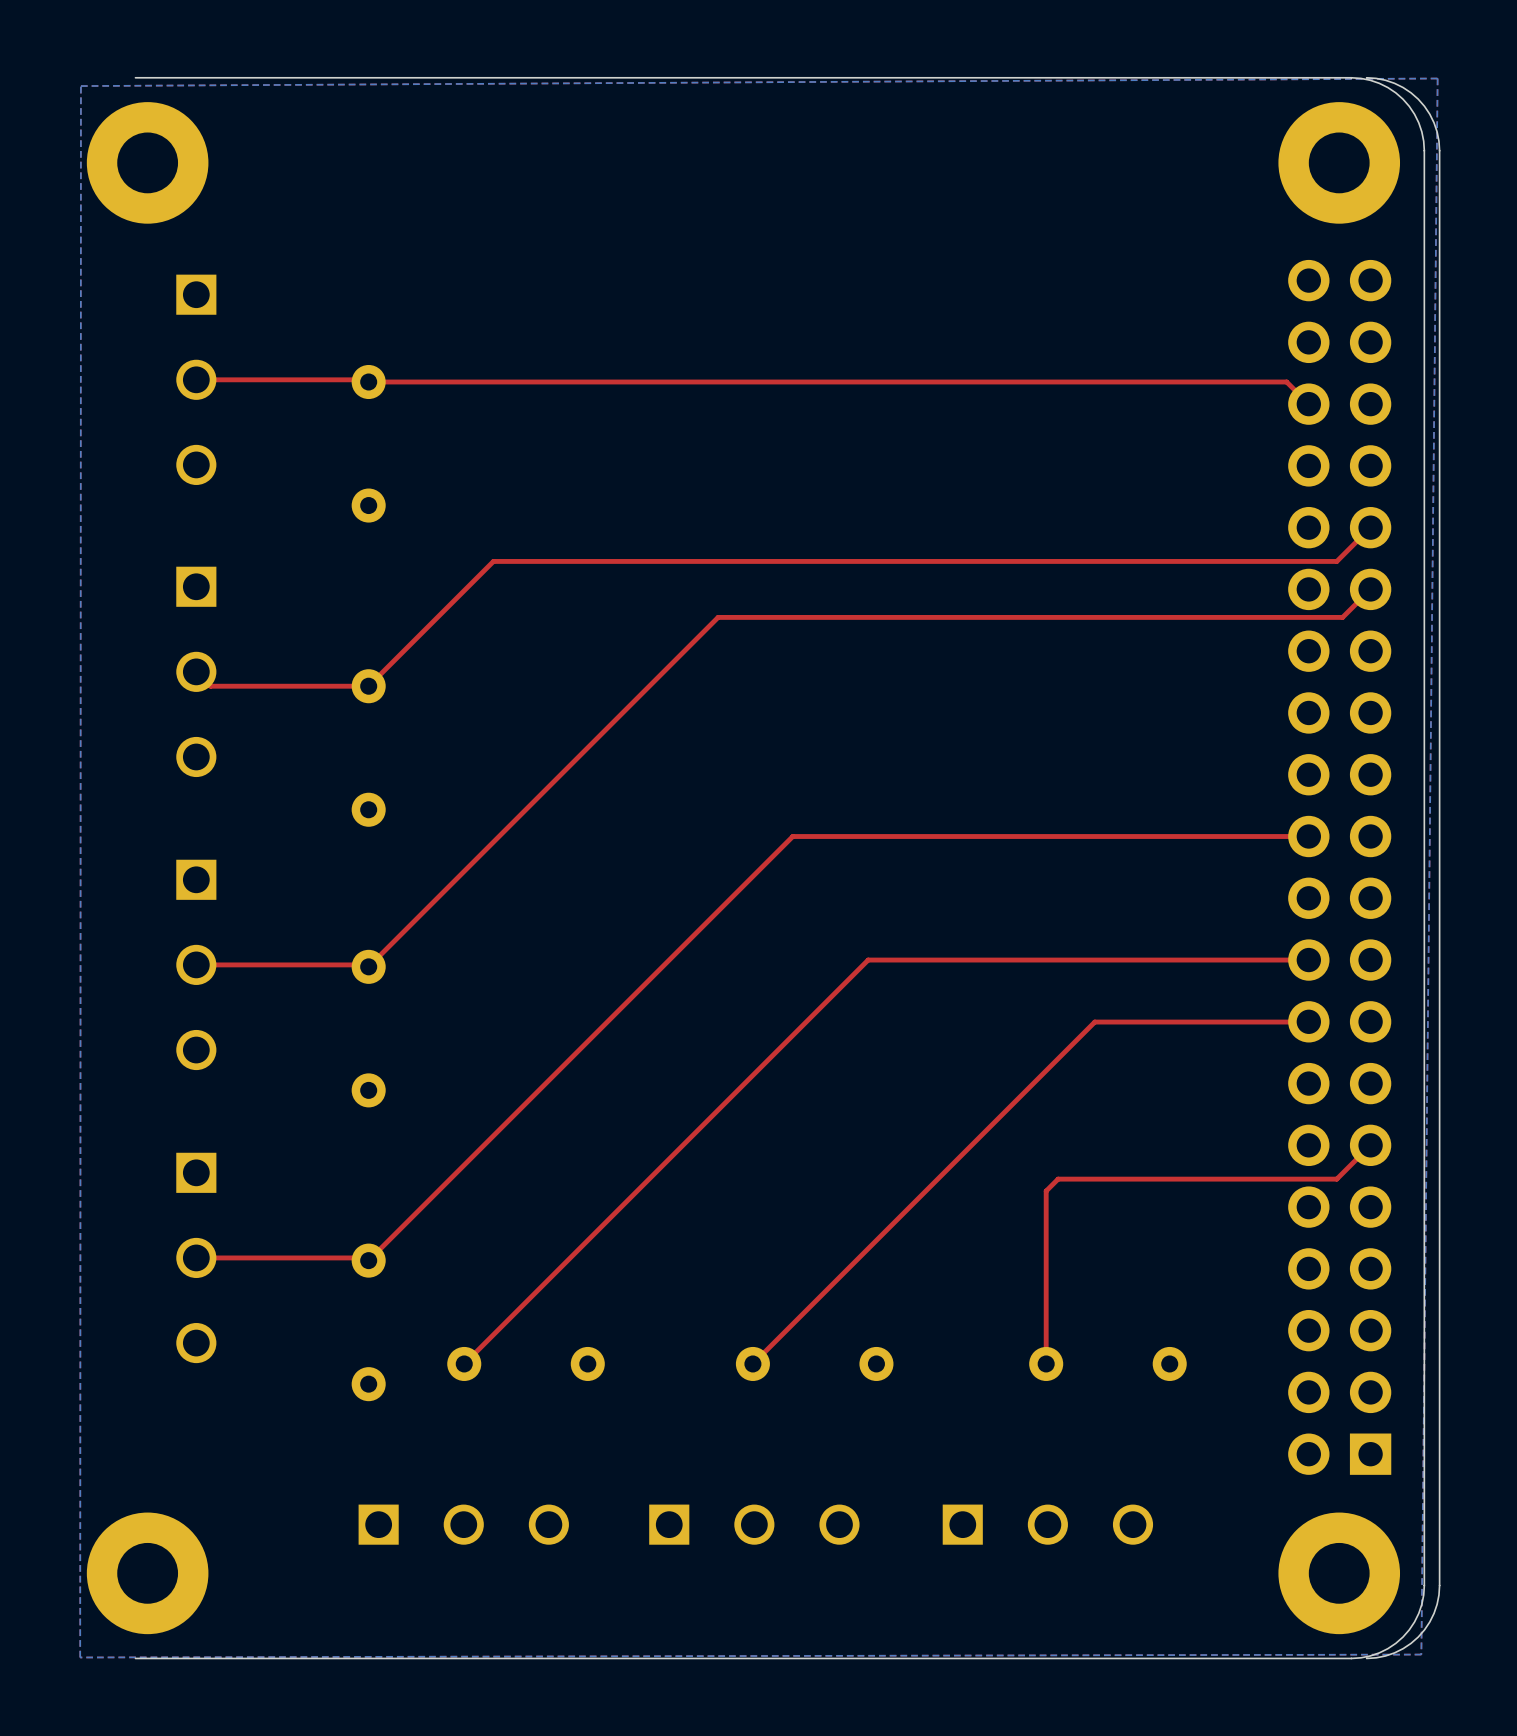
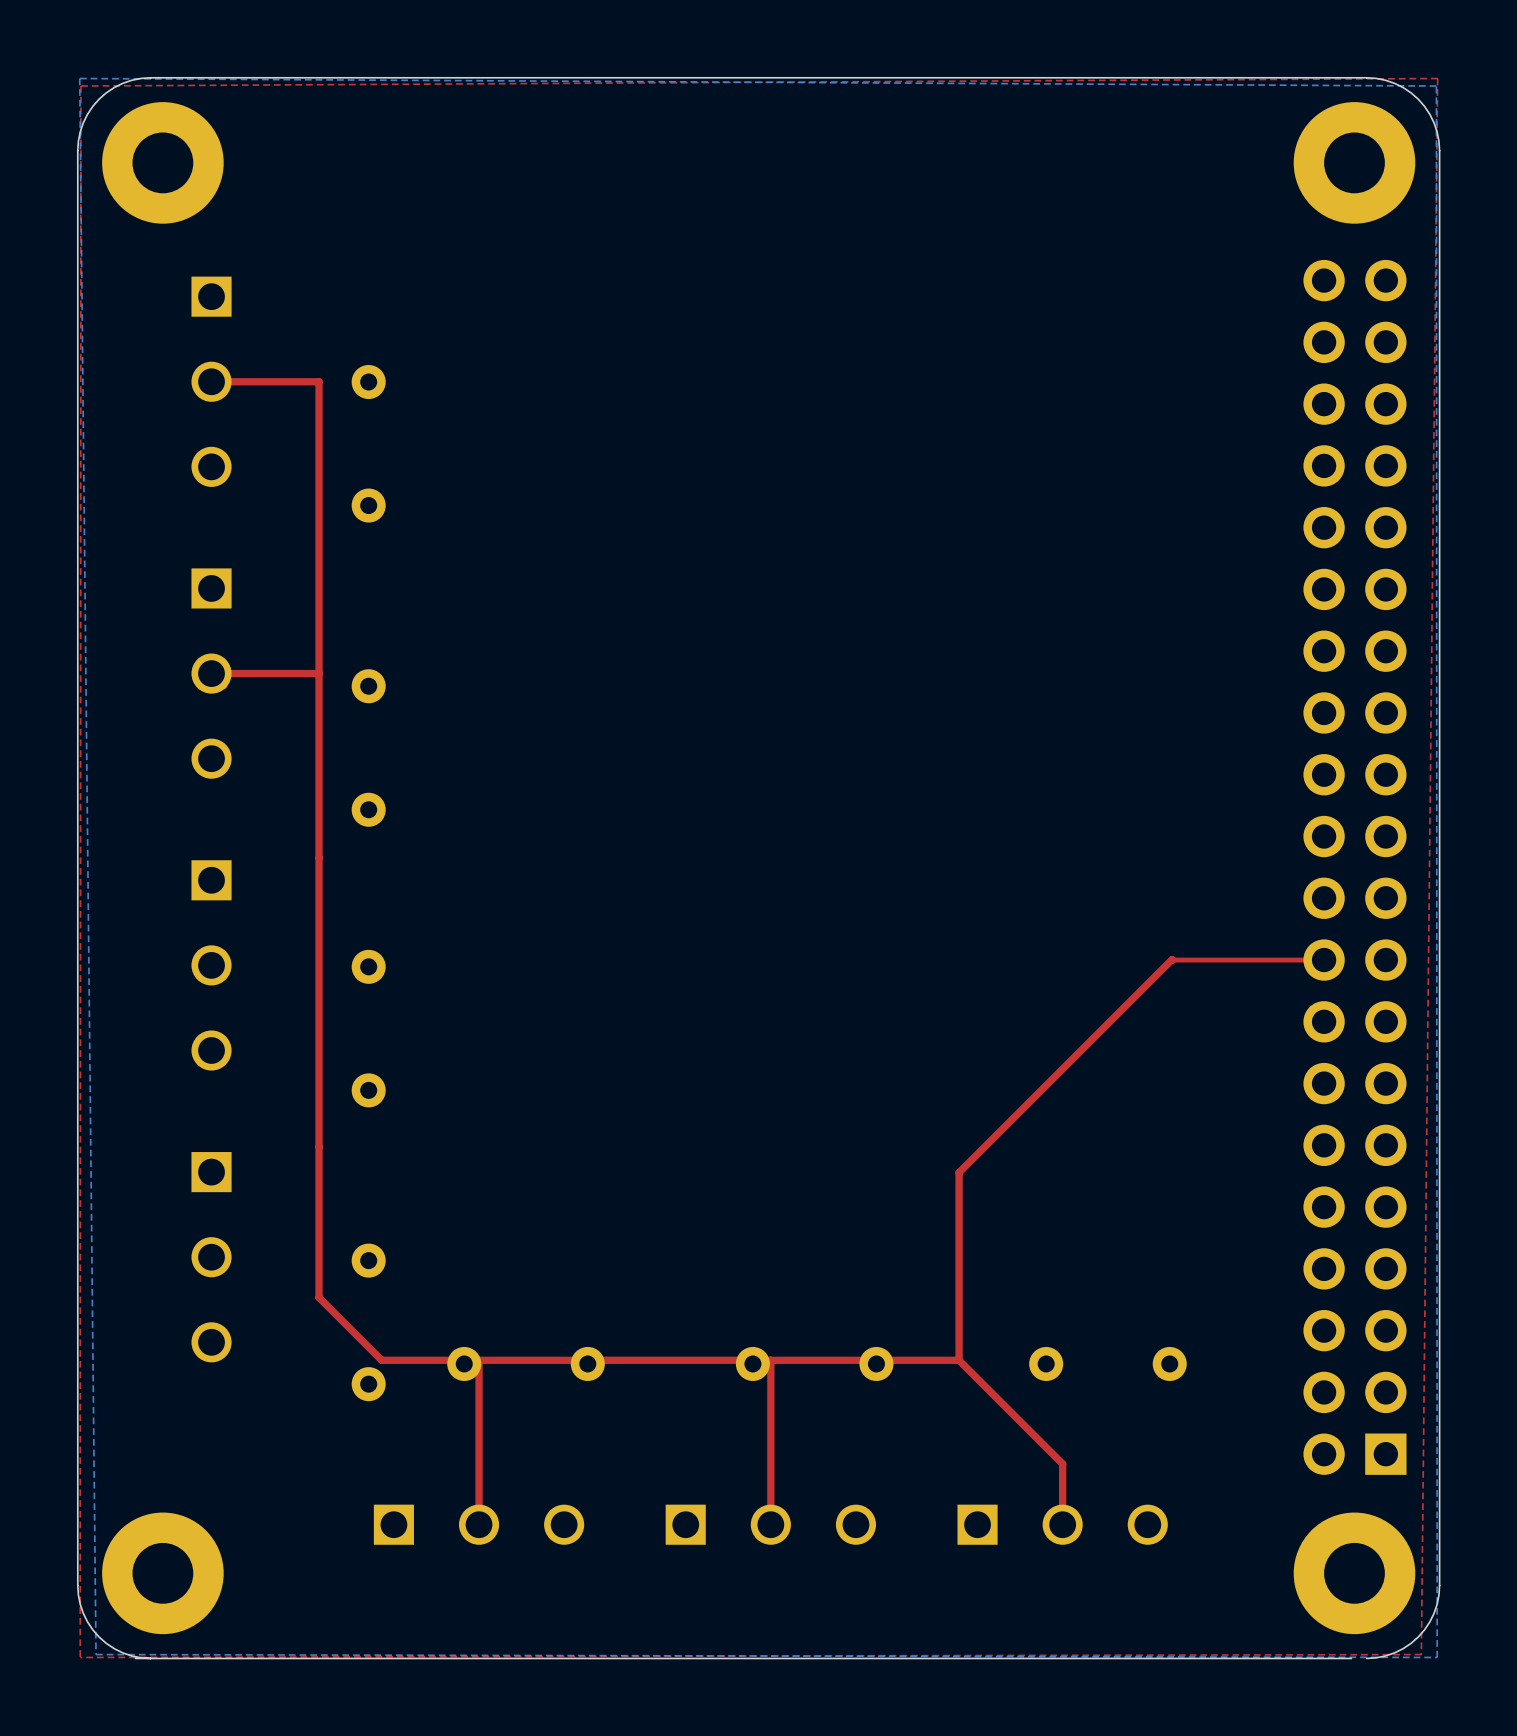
board edge: (150, 77) (135, 77) -> (150, 77) (122, 83) (99, 99) (83, 122) (77, 150) (77, 1585) (83, 1613) (99, 1637) (122, 1652) (150, 1658)
board edge: (1351, 77) (1379, 83) (1402, 99) (1418, 122) (1424, 150) (1424, 1585) (1418, 1613) (1402, 1637) (1379, 1652) (1351, 1658) -> (1351, 77) (1366, 77)
bottom zone outline: (1437, 78) (80, 86) (80, 1657) (1421, 1654) (1437, 78) -> (79, 78) (1436, 86) (1437, 1657) (96, 1654) (79, 78)
part position: (147, 162) -> (162, 162)
part position: (1339, 162) -> (1354, 162)
top track: (196, 379) (366, 379) (368, 382) (1286, 382) (1308, 404) -> none
part position: (196, 379) -> (211, 381)
top track: none -> (211, 381) (319, 381) (319, 1297) (381, 1360) (959, 1360)
top track: (1370, 527) (1336, 561) (493, 561) (368, 686) (210, 686) (196, 671) -> none
top track: (1370, 589) (1342, 617) (718, 617) (368, 966) (366, 964) (196, 964) -> none
part position: (196, 671) -> (211, 673)
top track: none -> (319, 673) (211, 673) (223, 685)
top track: (1308, 836) (792, 836) (368, 1260) (366, 1257) (196, 1257) -> none
part position: (1339, 867) -> (1354, 867)
top track: (1172, 960) (868, 960) (464, 1363) -> (1172, 960) (959, 1172) (959, 1360)
part position: (196, 964) -> (211, 965)
top track: (1308, 1022) (1094, 1022) (752, 1363) -> none
top track: (1370, 1145) (1336, 1179) (1058, 1179) (1046, 1191) (1046, 1363) -> none
part position: (196, 1257) -> (211, 1257)
top track: none -> (479, 1360) (479, 1524)
top track: none -> (770, 1360) (770, 1524)
top track: none -> (959, 1360) (1062, 1463) (1062, 1524)
part position: (463, 1524) -> (479, 1524)
part position: (754, 1524) -> (770, 1524)
part position: (1047, 1524) -> (1062, 1524)
part position: (147, 1573) -> (162, 1573)
part position: (1339, 1573) -> (1354, 1573)

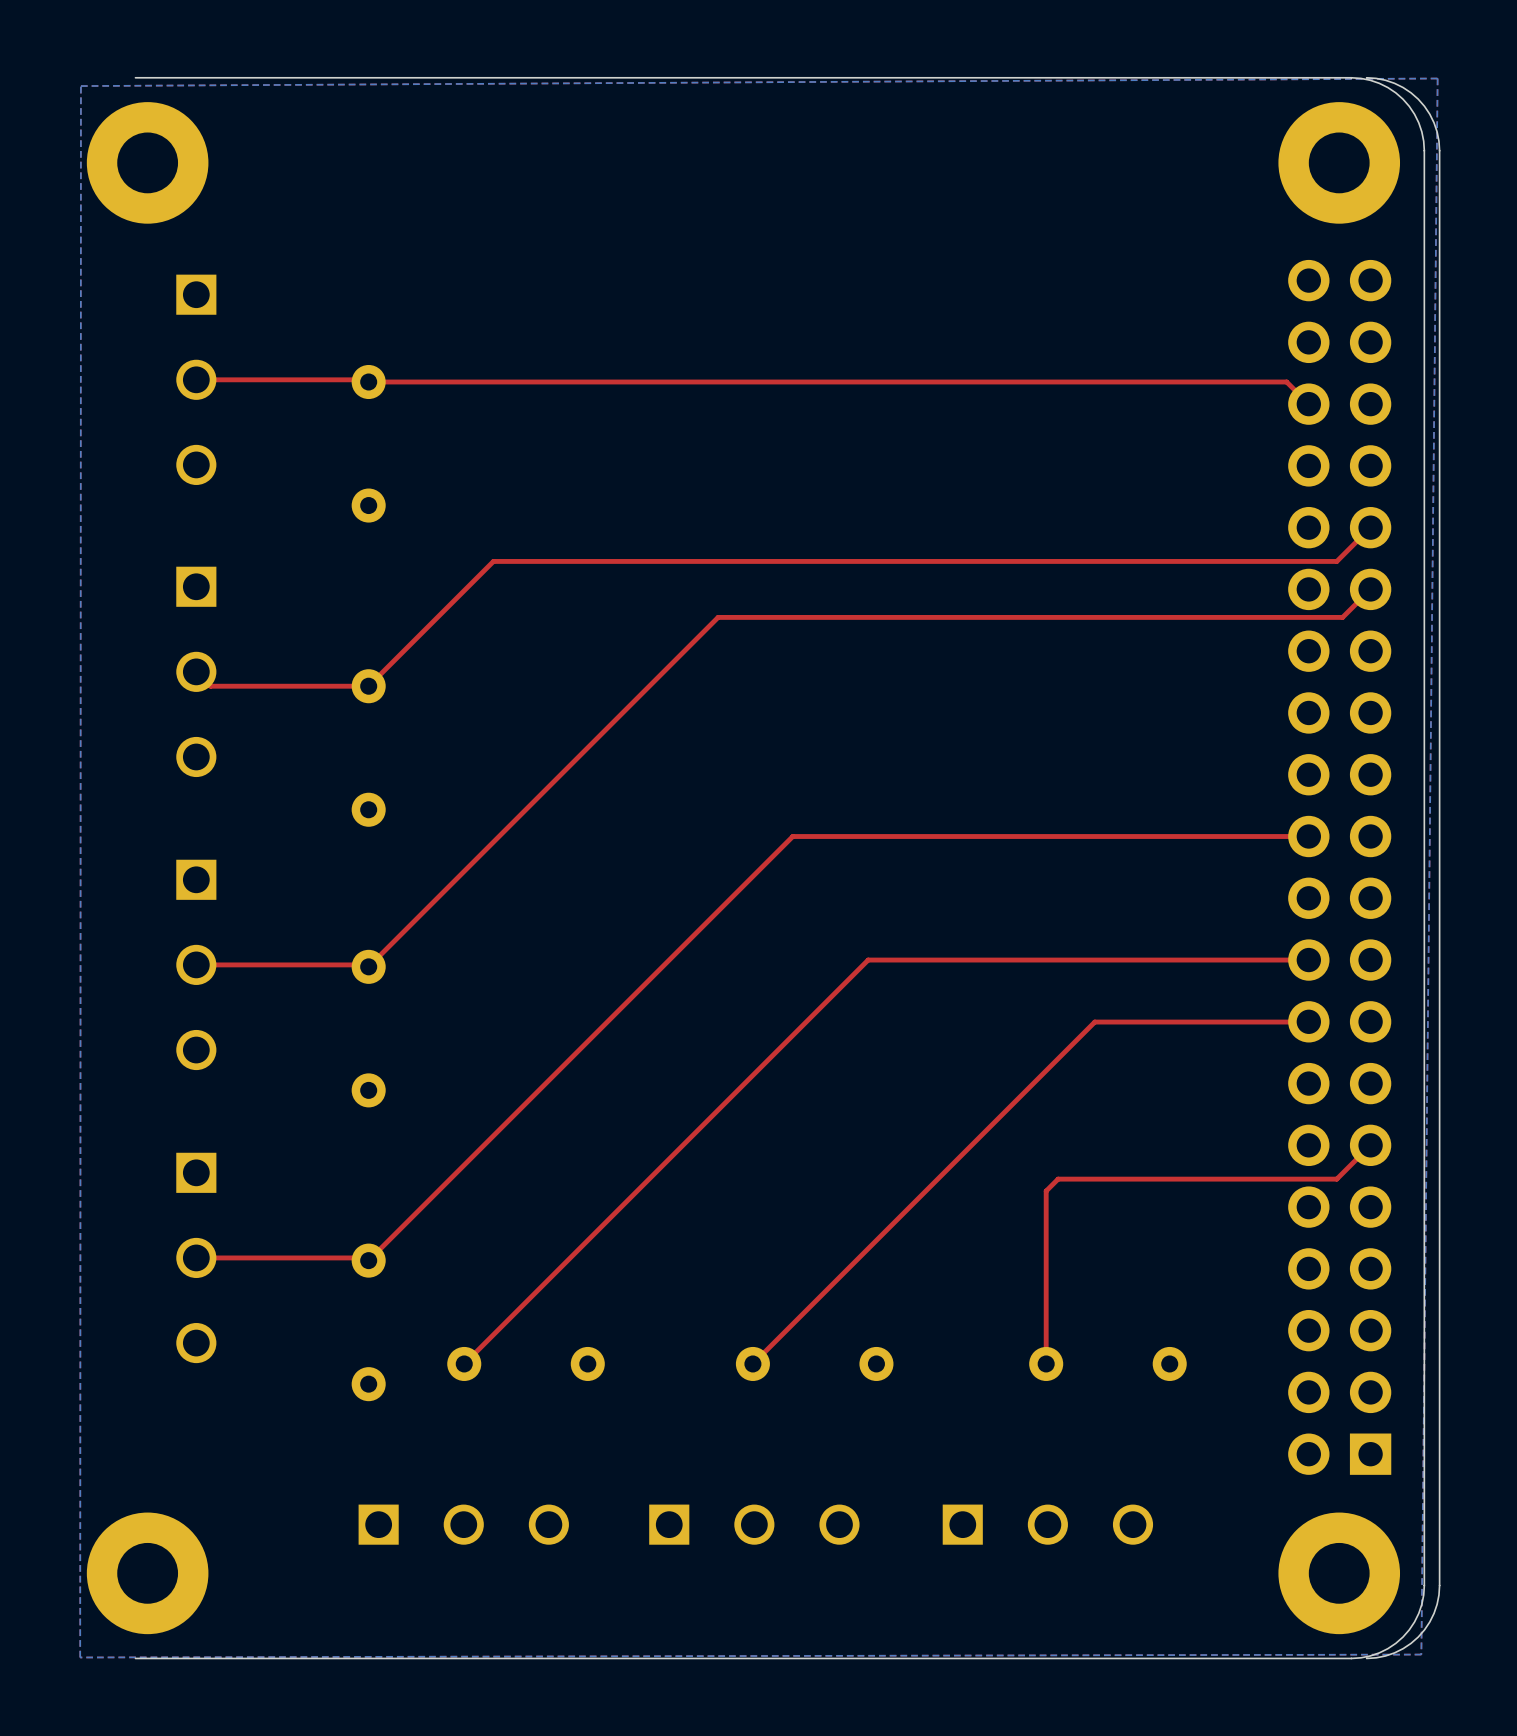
board edge: (150, 77) (122, 83) (99, 99) (83, 122) (77, 150) (77, 1585) (83, 1613) (99, 1637) (122, 1652) (150, 1658) -> (150, 77) (135, 77)
board edge: (1366, 77) (1351, 77) -> (1351, 1658) (1379, 1652) (1402, 1637) (1418, 1613) (1424, 1585) (1424, 150) (1418, 122) (1402, 99) (1379, 83) (1351, 77)
bottom zone outline: (79, 78) (1436, 86) (1437, 1657) (96, 1654) (79, 78) -> (1437, 78) (1421, 1654) (80, 1657) (80, 86) (1437, 78)
part position: (162, 162) -> (147, 162)
part position: (1354, 162) -> (1339, 162)
top track: none -> (196, 379) (366, 379) (368, 382) (1286, 382) (1308, 404)
top track: (211, 381) (319, 381) (319, 1297) (381, 1360) (959, 1360) -> none
part position: (211, 381) -> (196, 379)
top track: none -> (1370, 527) (1336, 561) (493, 561) (368, 686) (210, 686) (196, 671)
top track: none -> (1370, 589) (1342, 617) (718, 617) (368, 966) (366, 964) (196, 964)
part position: (211, 673) -> (196, 671)
top track: (319, 673) (211, 673) (223, 685) -> none
top track: none -> (1308, 836) (792, 836) (368, 1260) (366, 1257) (196, 1257)
part position: (1354, 867) -> (1339, 867)
top track: (1172, 960) (959, 1172) (959, 1360) -> (1172, 960) (868, 960) (464, 1363)
part position: (211, 965) -> (196, 964)
top track: none -> (1308, 1022) (1094, 1022) (752, 1363)
top track: none -> (1370, 1145) (1336, 1179) (1058, 1179) (1046, 1191) (1046, 1363)
part position: (211, 1257) -> (196, 1257)
top track: (479, 1360) (479, 1524) -> none
top track: (770, 1360) (770, 1524) -> none
top track: (959, 1360) (1062, 1463) (1062, 1524) -> none
part position: (479, 1524) -> (463, 1524)
part position: (770, 1524) -> (754, 1524)
part position: (1062, 1524) -> (1047, 1524)
part position: (162, 1573) -> (147, 1573)
part position: (1354, 1573) -> (1339, 1573)

